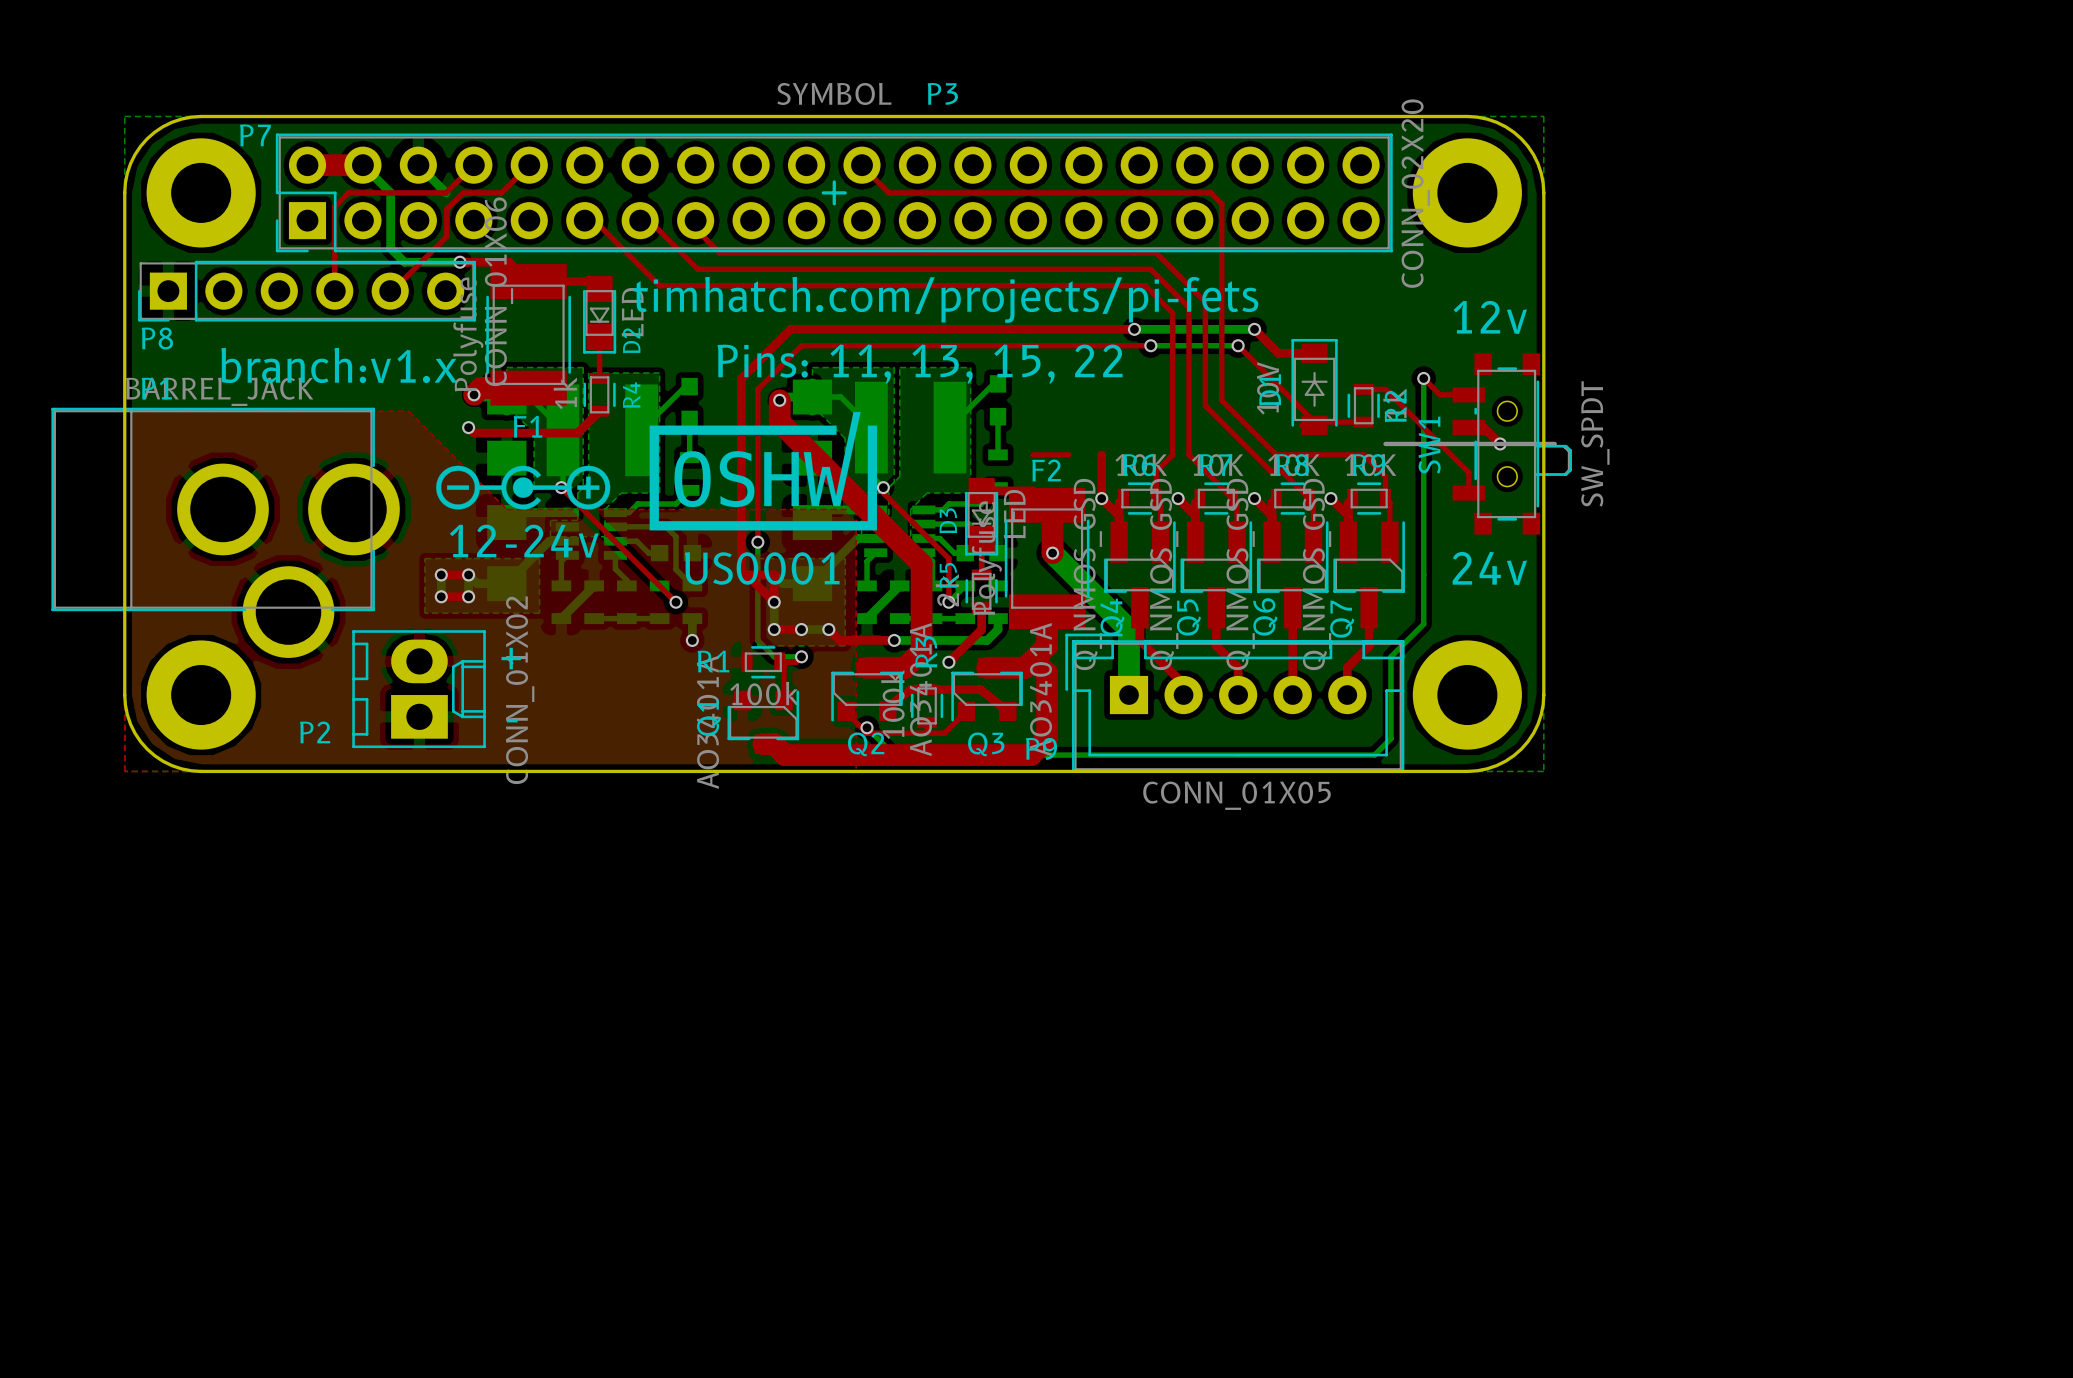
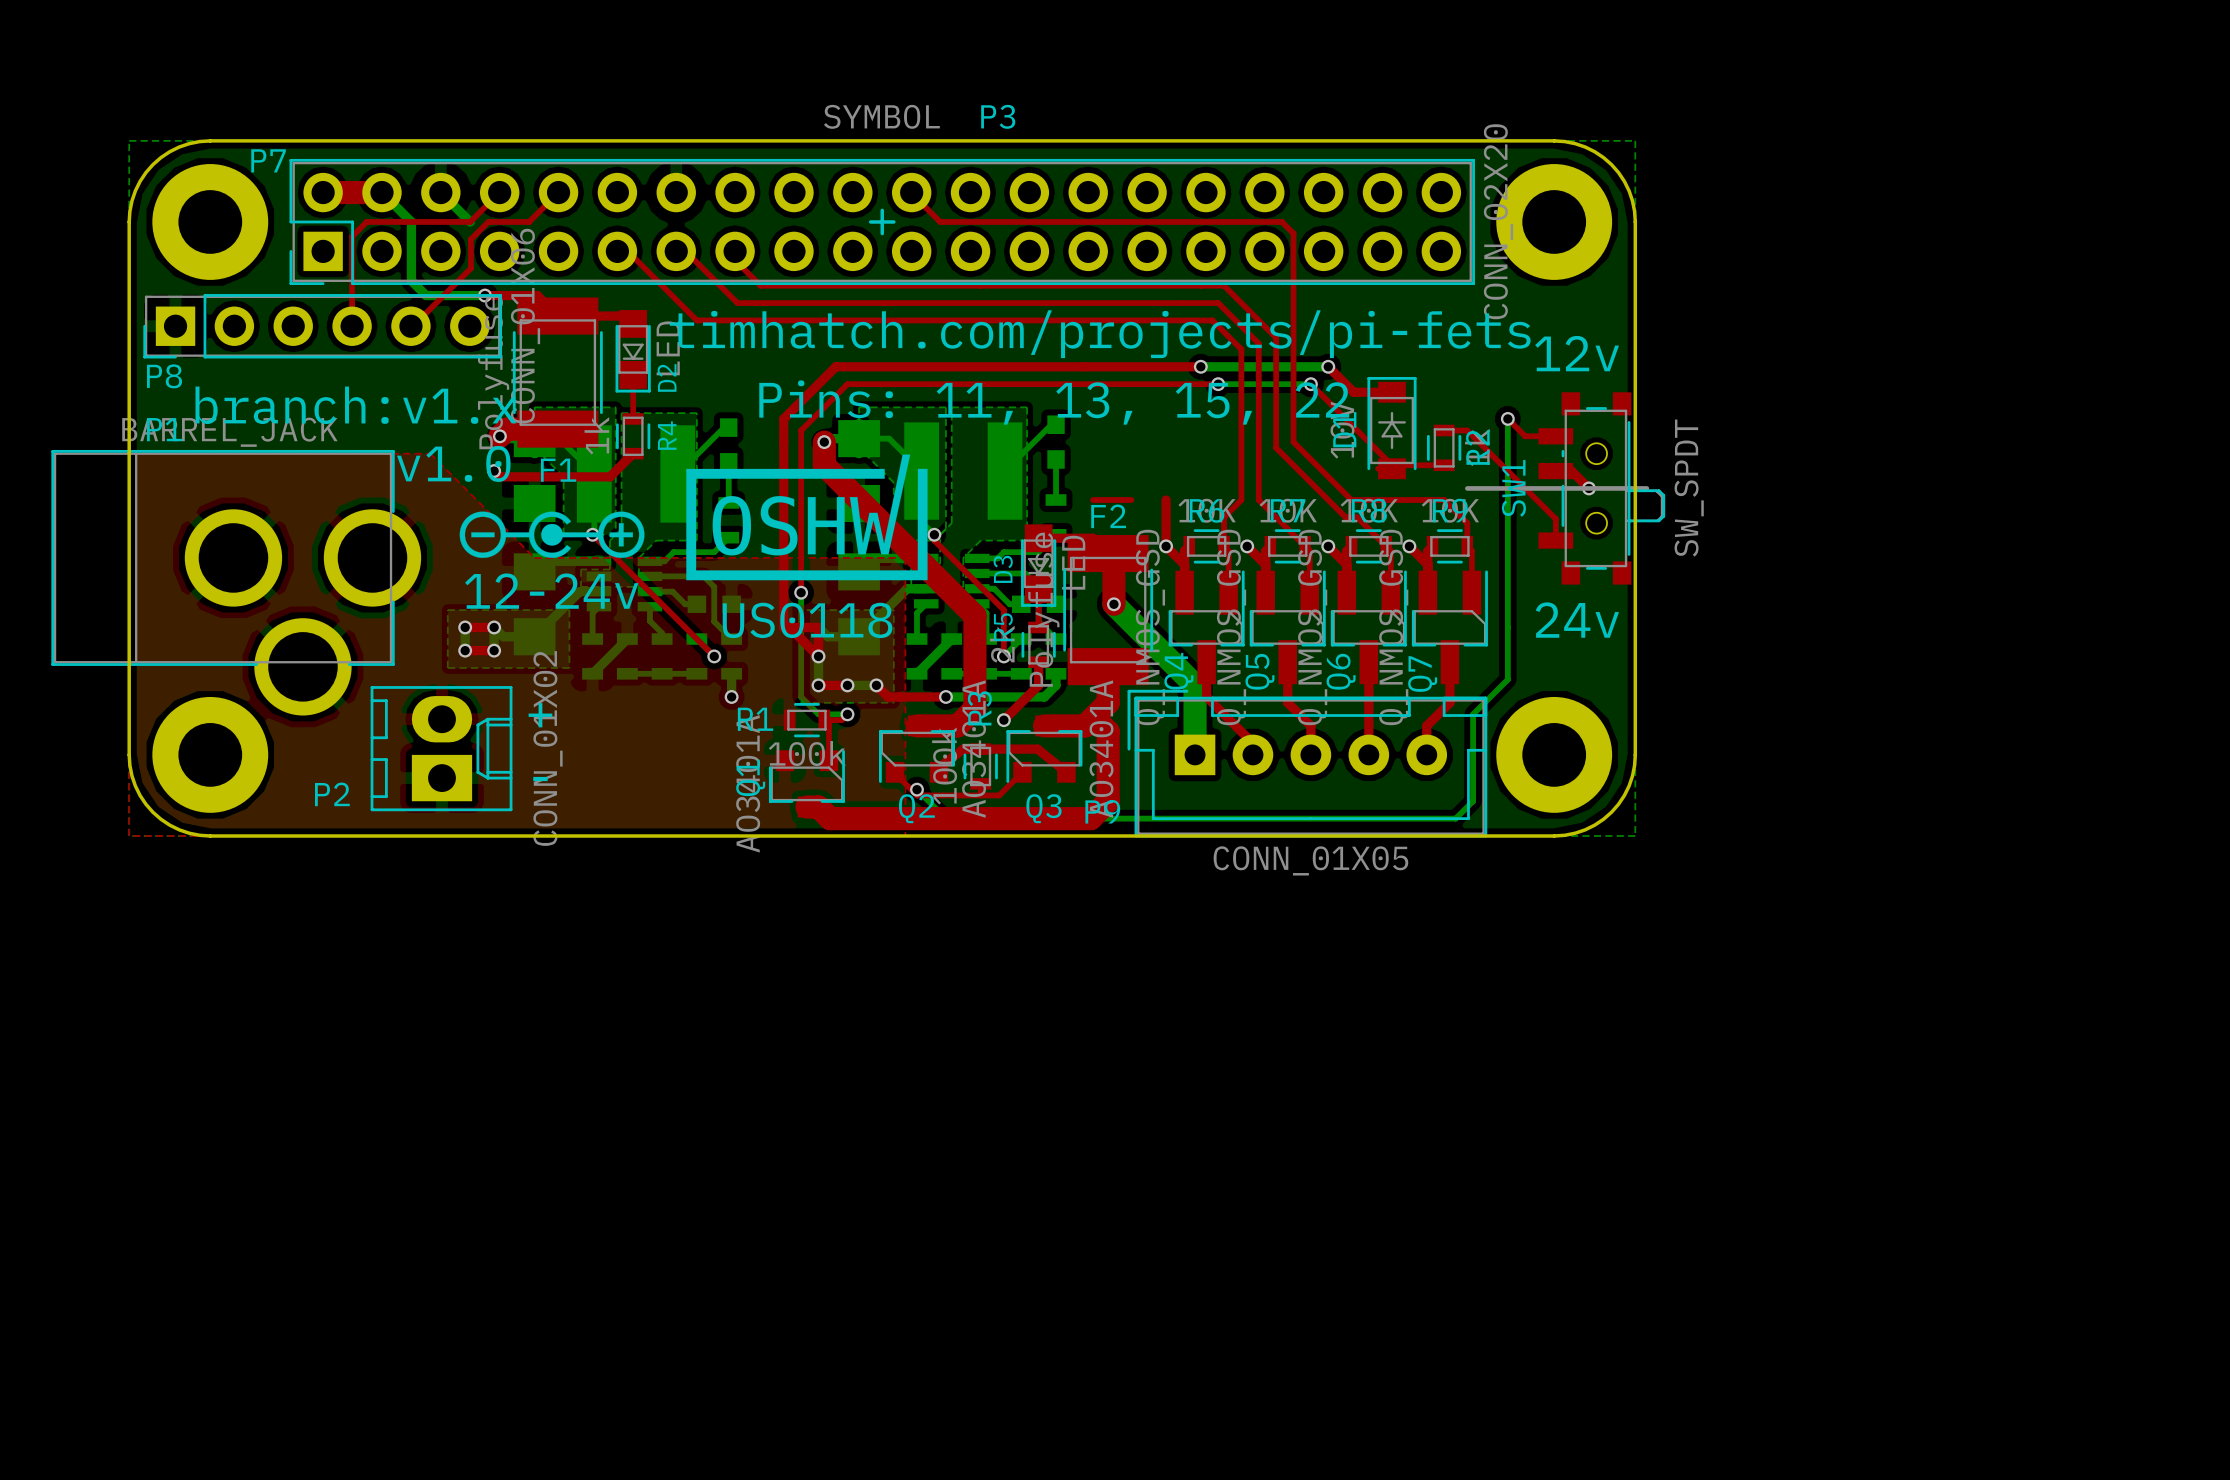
drawing shape: [649, 412, 878, 585] -> [686, 454, 928, 639]
text: none -> v1.0 (453, 463)

